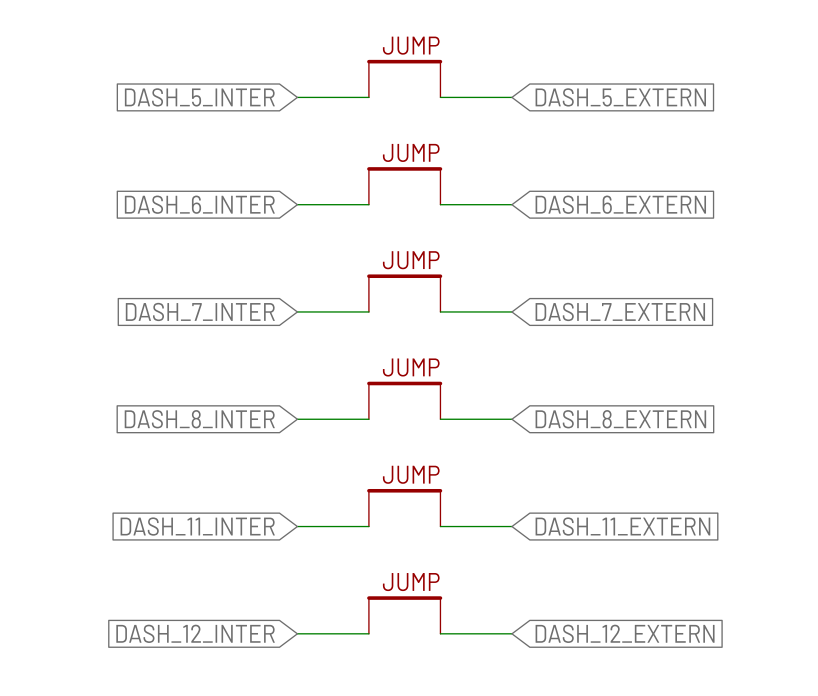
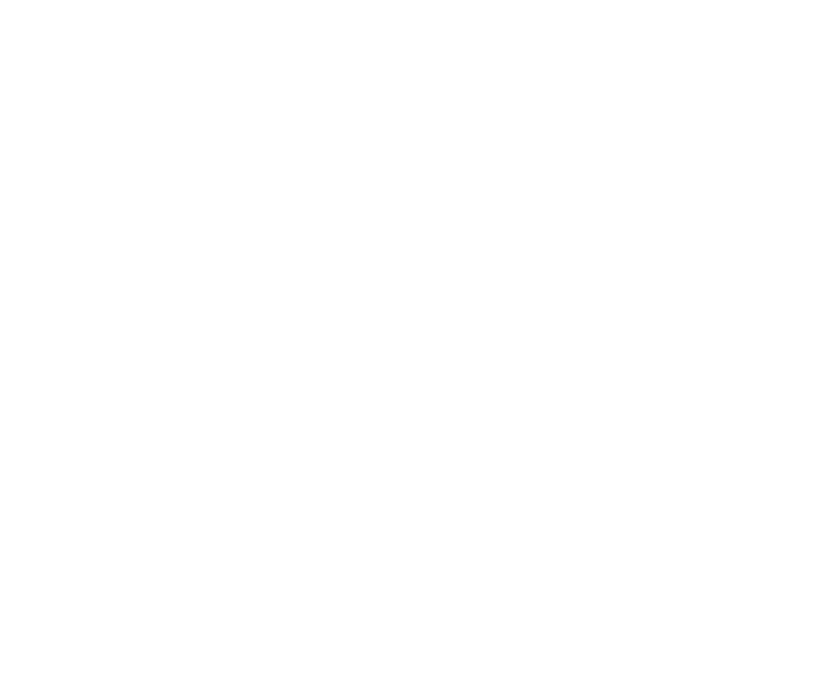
part: (404, 78) -> none
global label: DASH_5_INTER (199, 97) -> none
wire: (297, 97) (368, 97) -> none
wire: (440, 97) (511, 97) -> none
global label: DASH_5_EXTERN (620, 97) -> none
part: (404, 185) -> none
global label: DASH_6_INTER (199, 204) -> none
wire: (297, 204) (368, 204) -> none
wire: (440, 204) (511, 204) -> none
global label: DASH_6_EXTERN (620, 204) -> none
part: (404, 293) -> none
global label: DASH_7_INTER (200, 311) -> none
wire: (297, 311) (368, 311) -> none
wire: (440, 311) (511, 311) -> none
global label: DASH_7_EXTERN (620, 311) -> none
part: (404, 400) -> none
global label: DASH_8_INTER (199, 419) -> none
wire: (297, 419) (368, 419) -> none
wire: (440, 419) (511, 419) -> none
global label: DASH_8_EXTERN (620, 419) -> none
part: (404, 507) -> none
global label: DASH_11_INTER (197, 526) -> none
wire: (297, 526) (368, 526) -> none
wire: (440, 526) (511, 526) -> none
global label: DASH_11_EXTERN (622, 526) -> none
part: (404, 615) -> none
global label: DASH_12_INTER (195, 633) -> none
wire: (297, 633) (368, 633) -> none
wire: (440, 633) (511, 633) -> none
global label: DASH_12_EXTERN (625, 633) -> none

